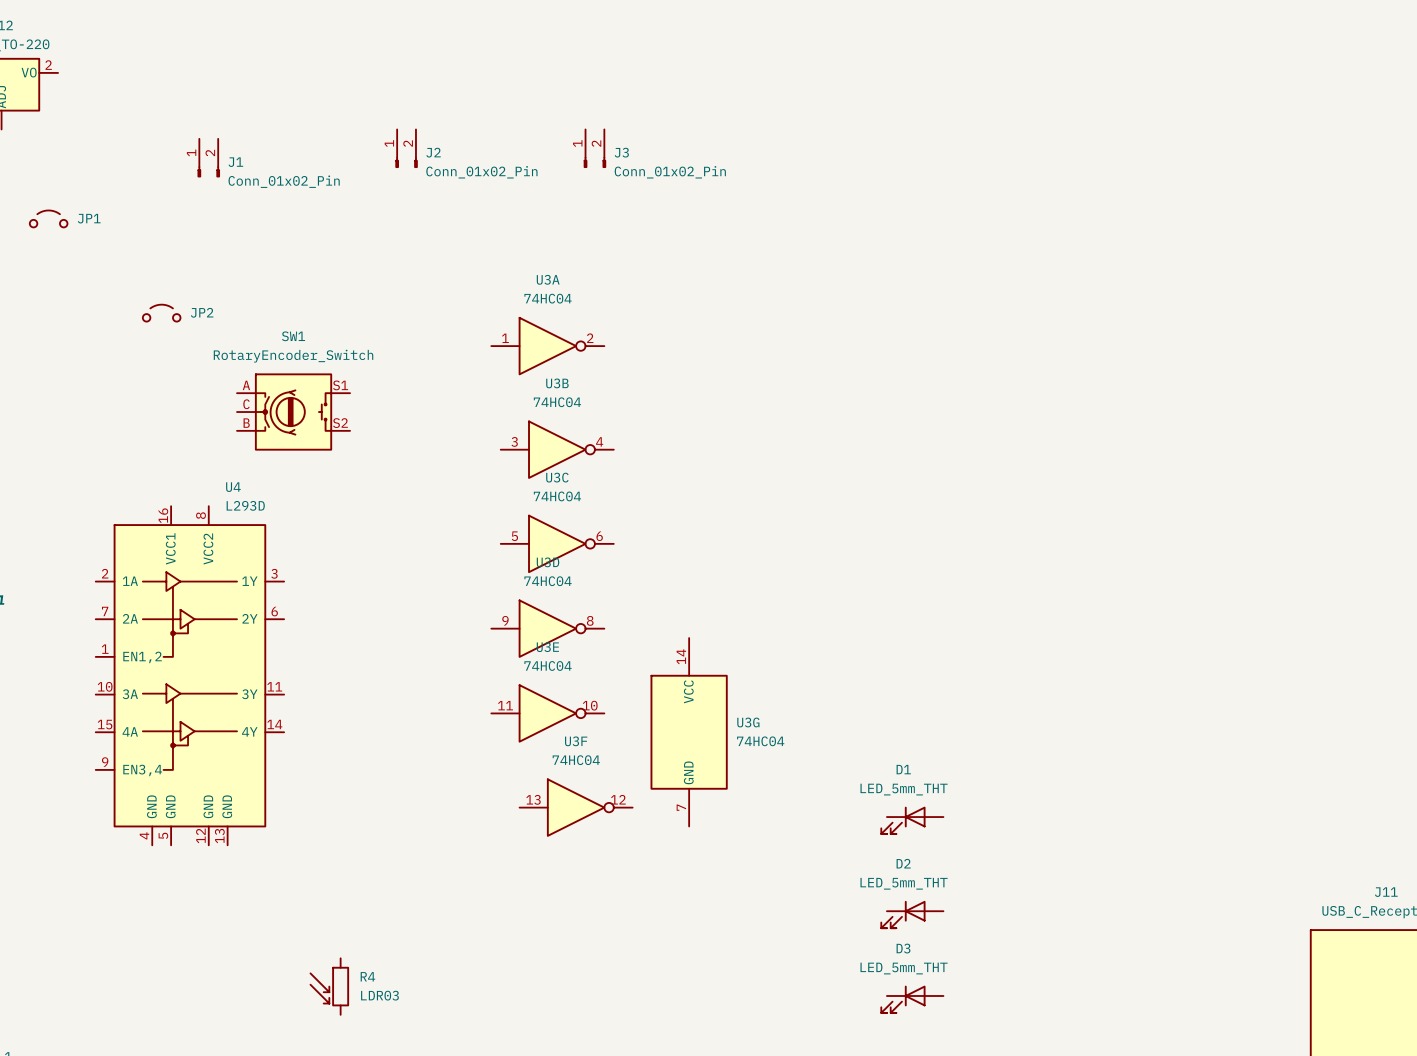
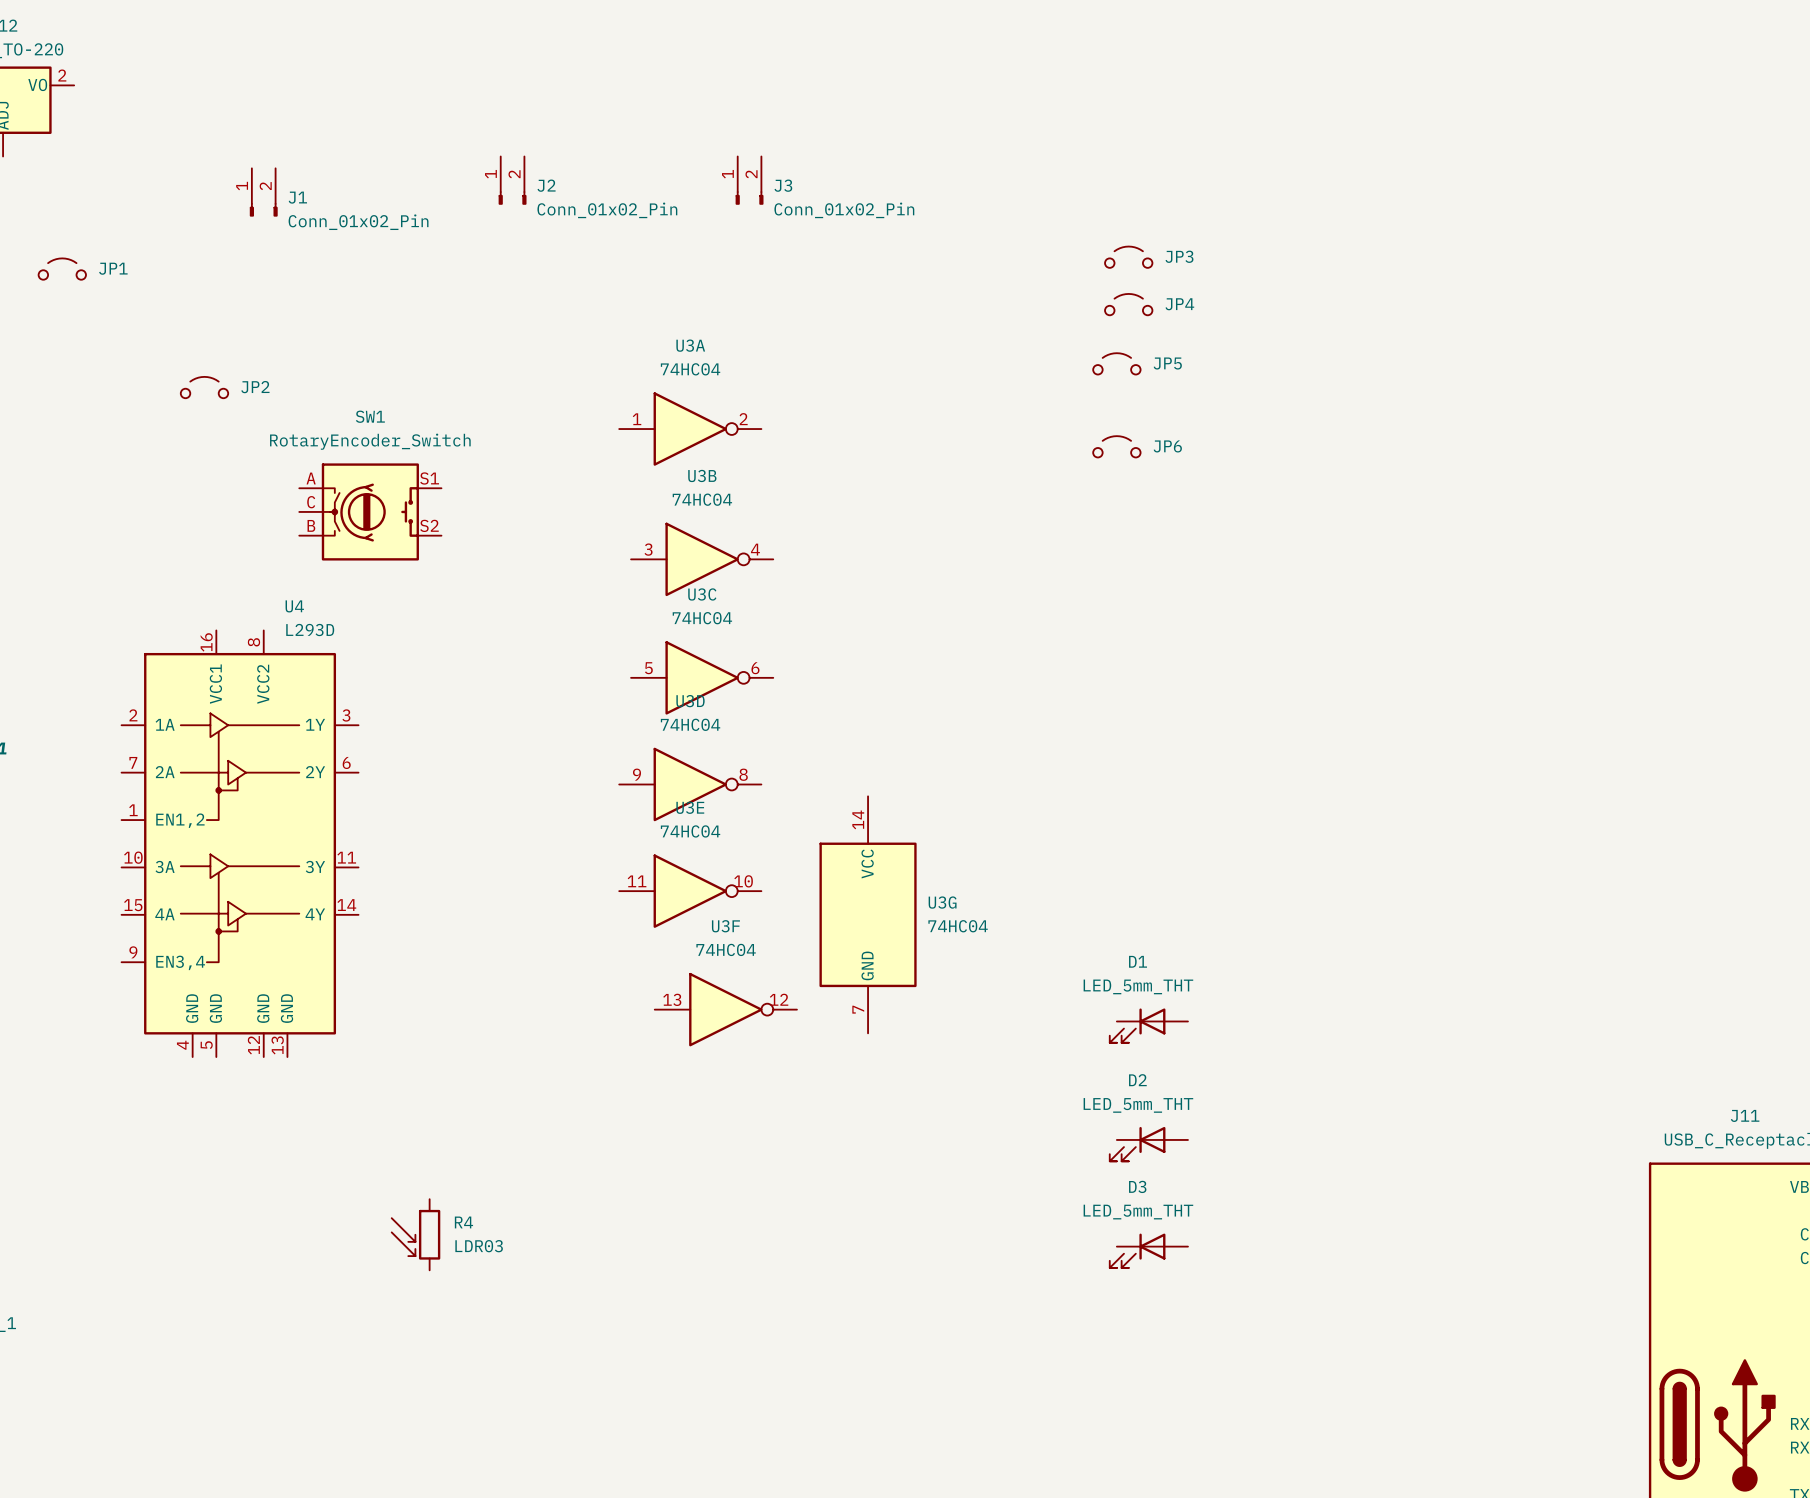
JP3: none -> (1128, 257)
JP4: none -> (1128, 304)
JP5: none -> (1116, 363)
JP6: none -> (1116, 446)

